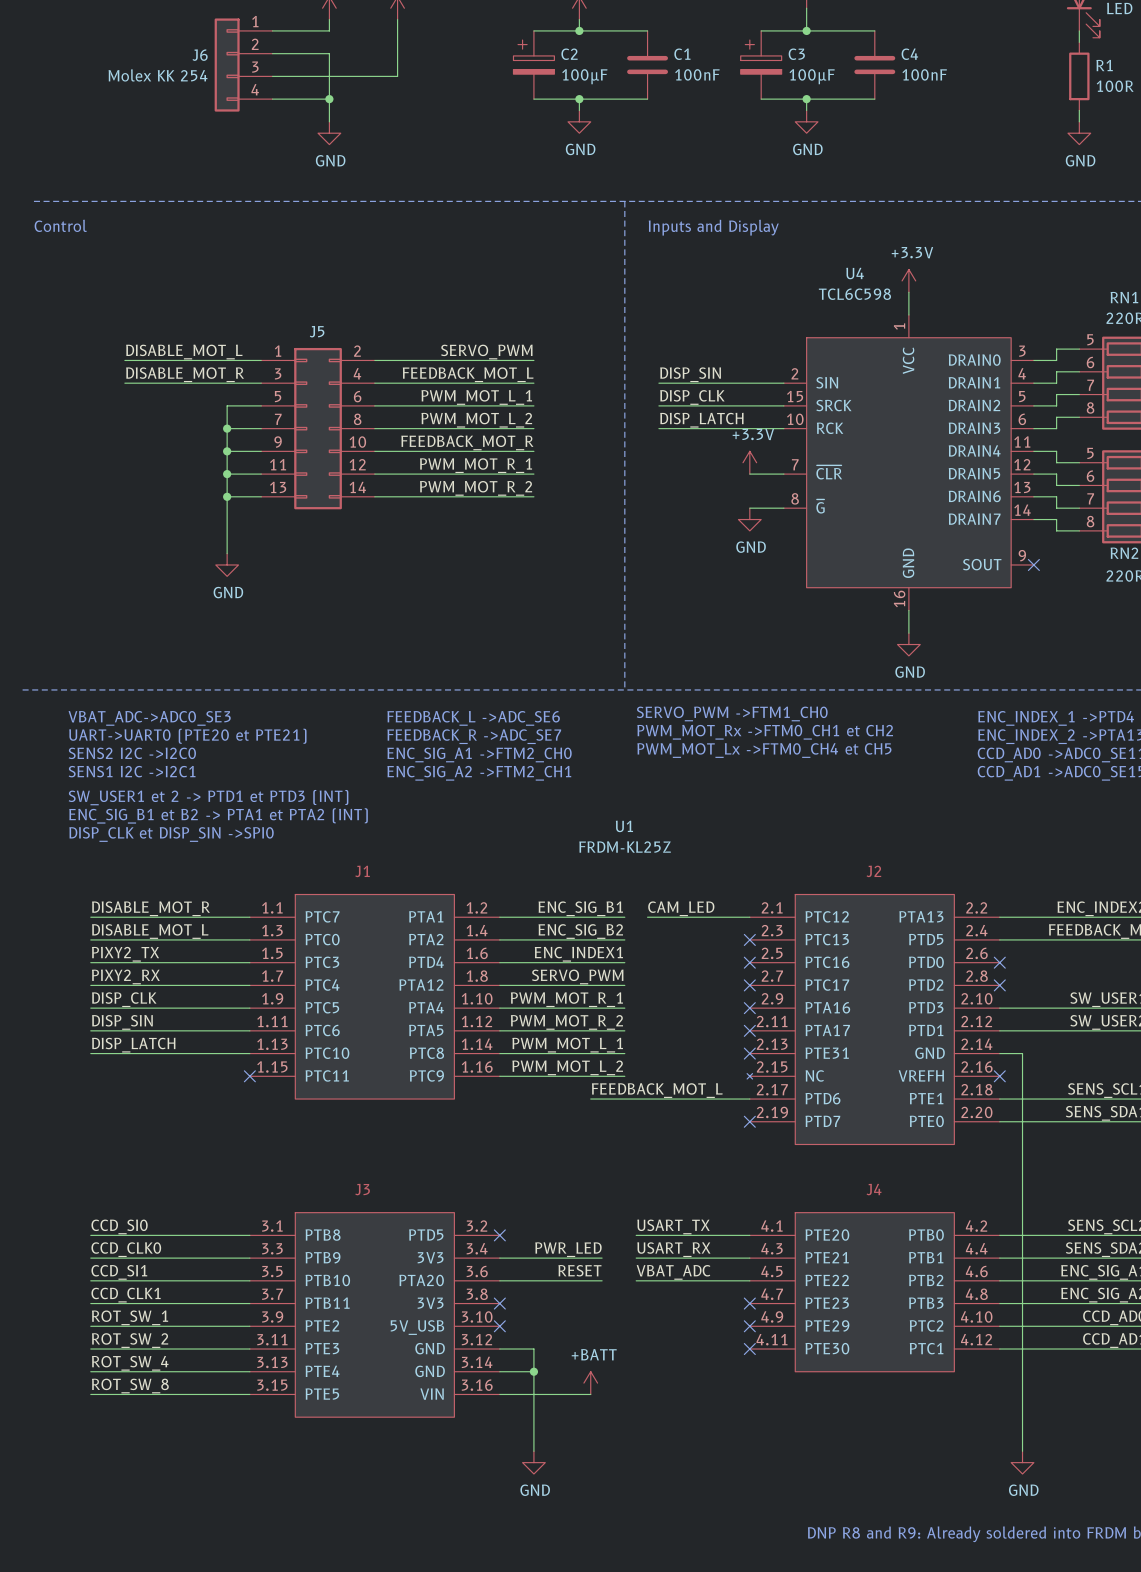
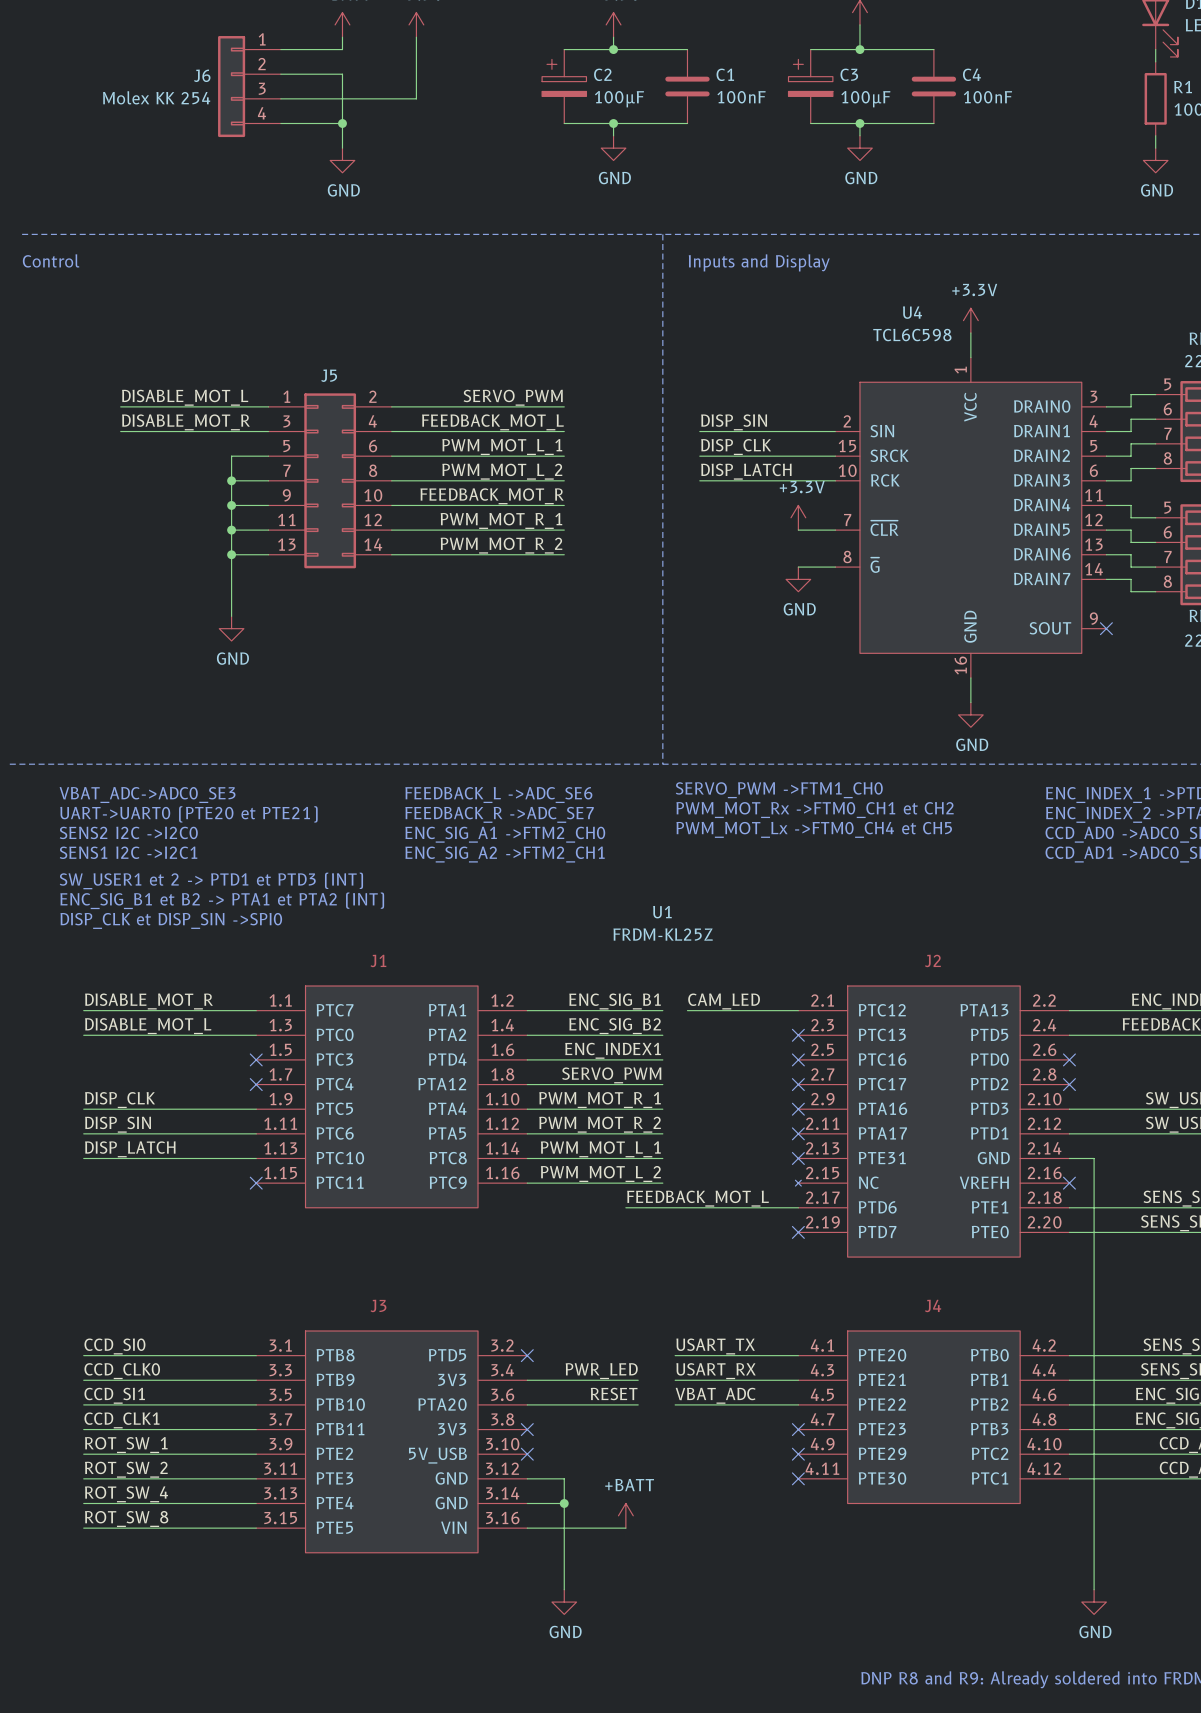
label: PIXY2_TX (125, 954) -> none
wire: (90, 962) (249, 962) -> none
no-connect mark: none -> (256, 1059)
label: PIXY2_RX (125, 976) -> none
wire: (90, 985) (249, 985) -> none
no-connect mark: none -> (256, 1084)

